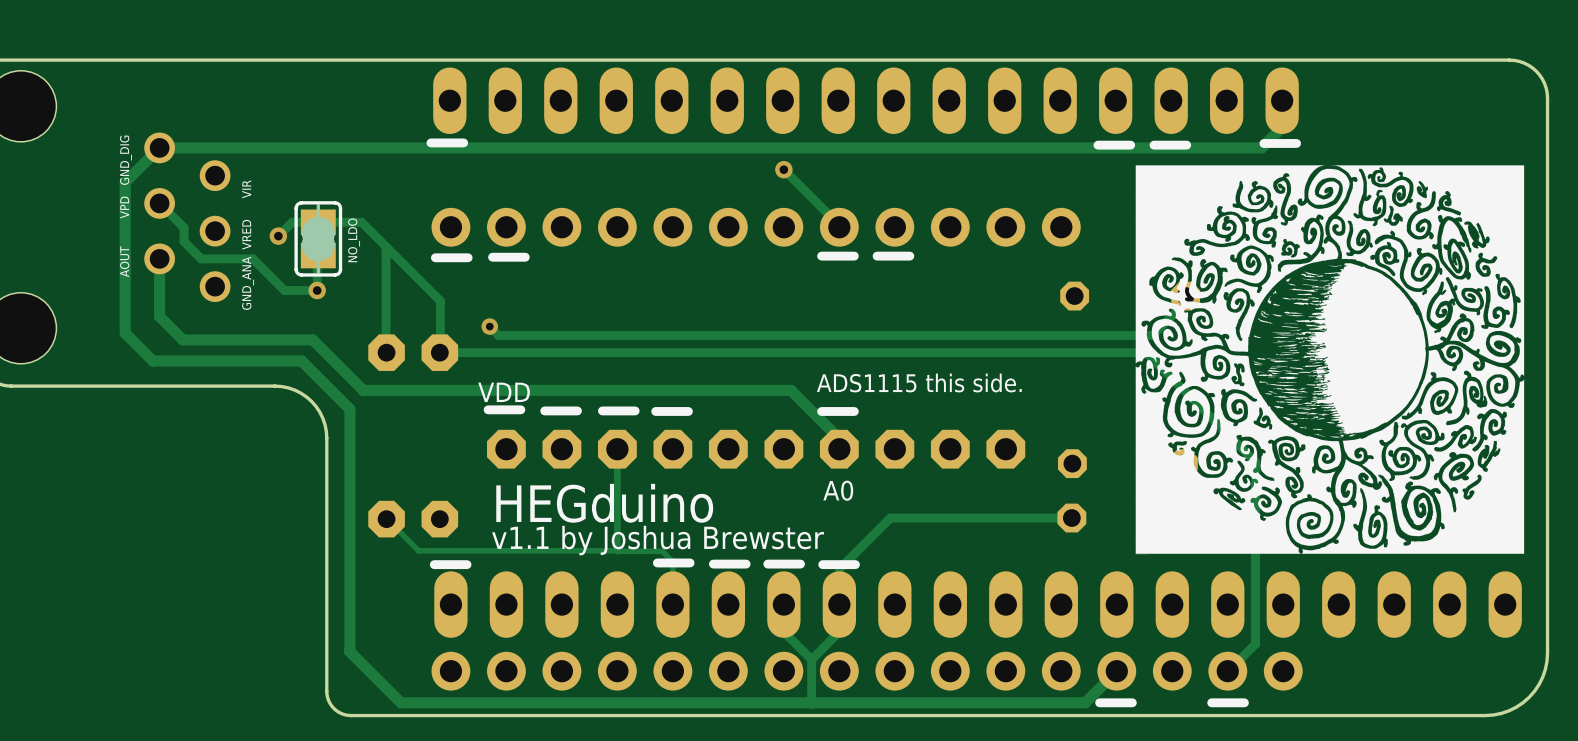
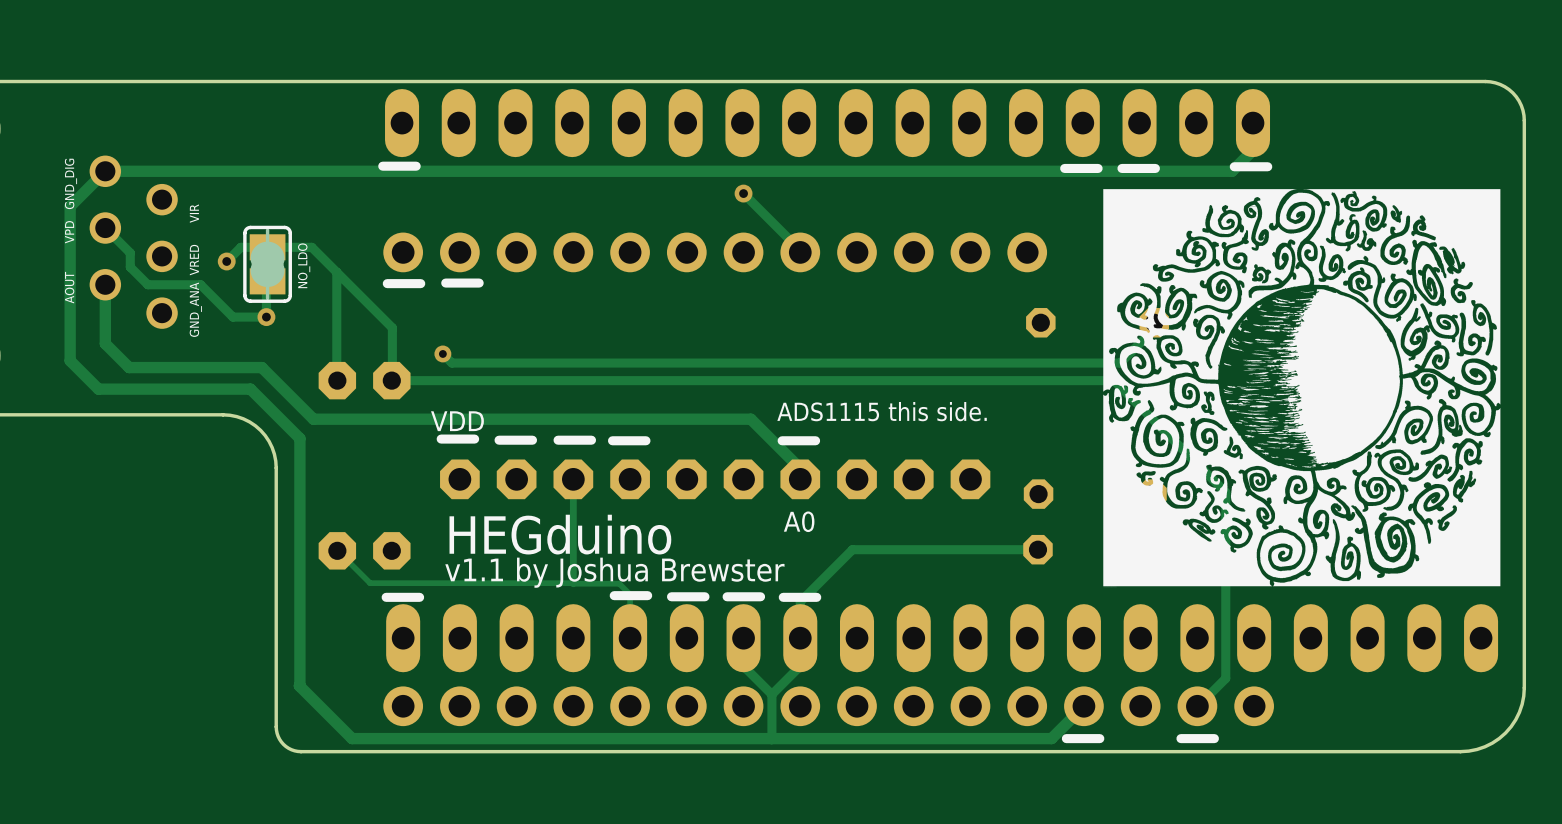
line: (854, 256) (821, 256) -> none
line: (909, 256) (877, 256) -> none

